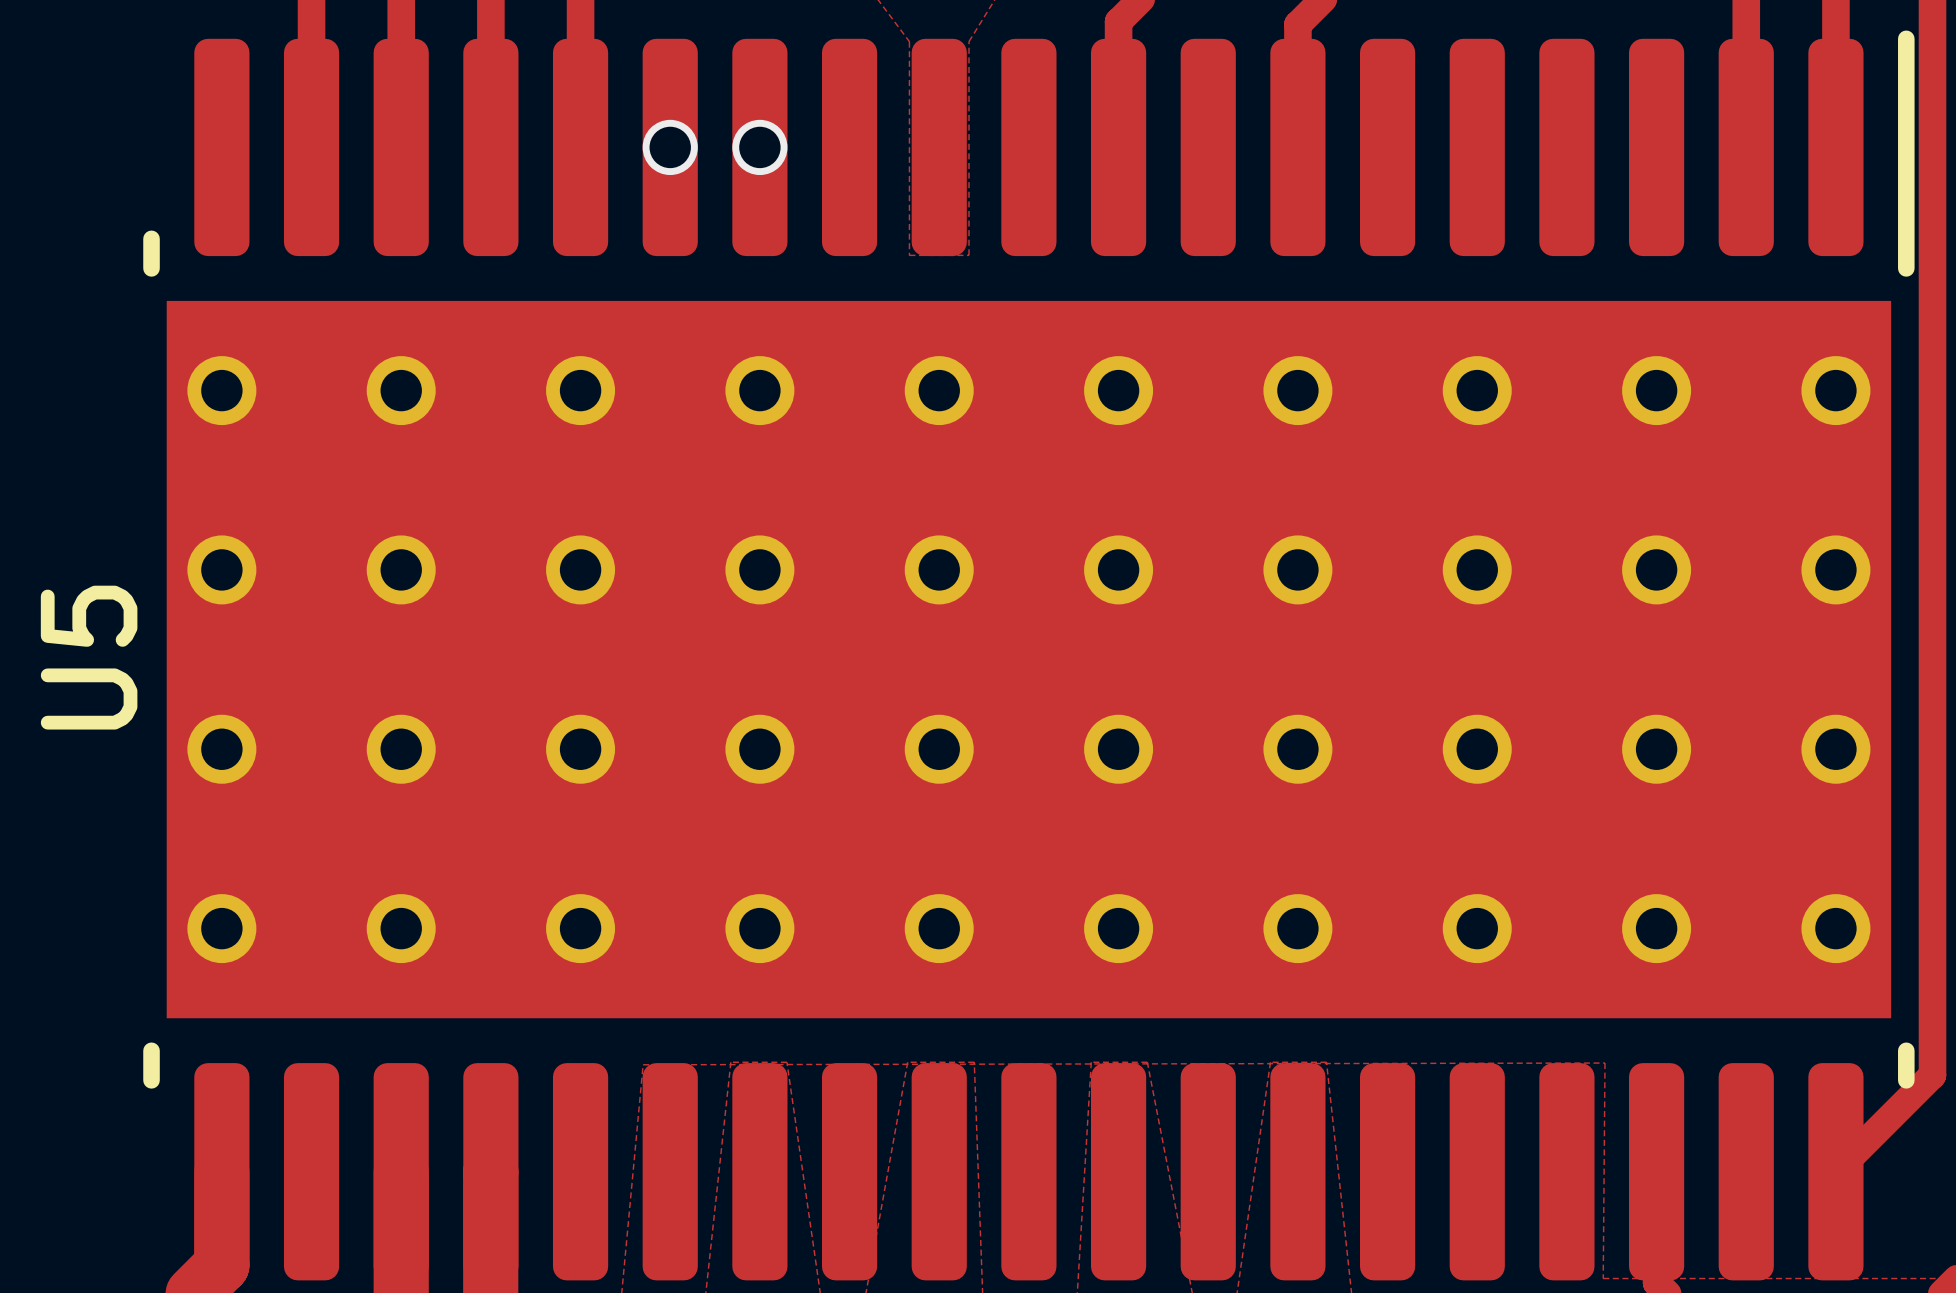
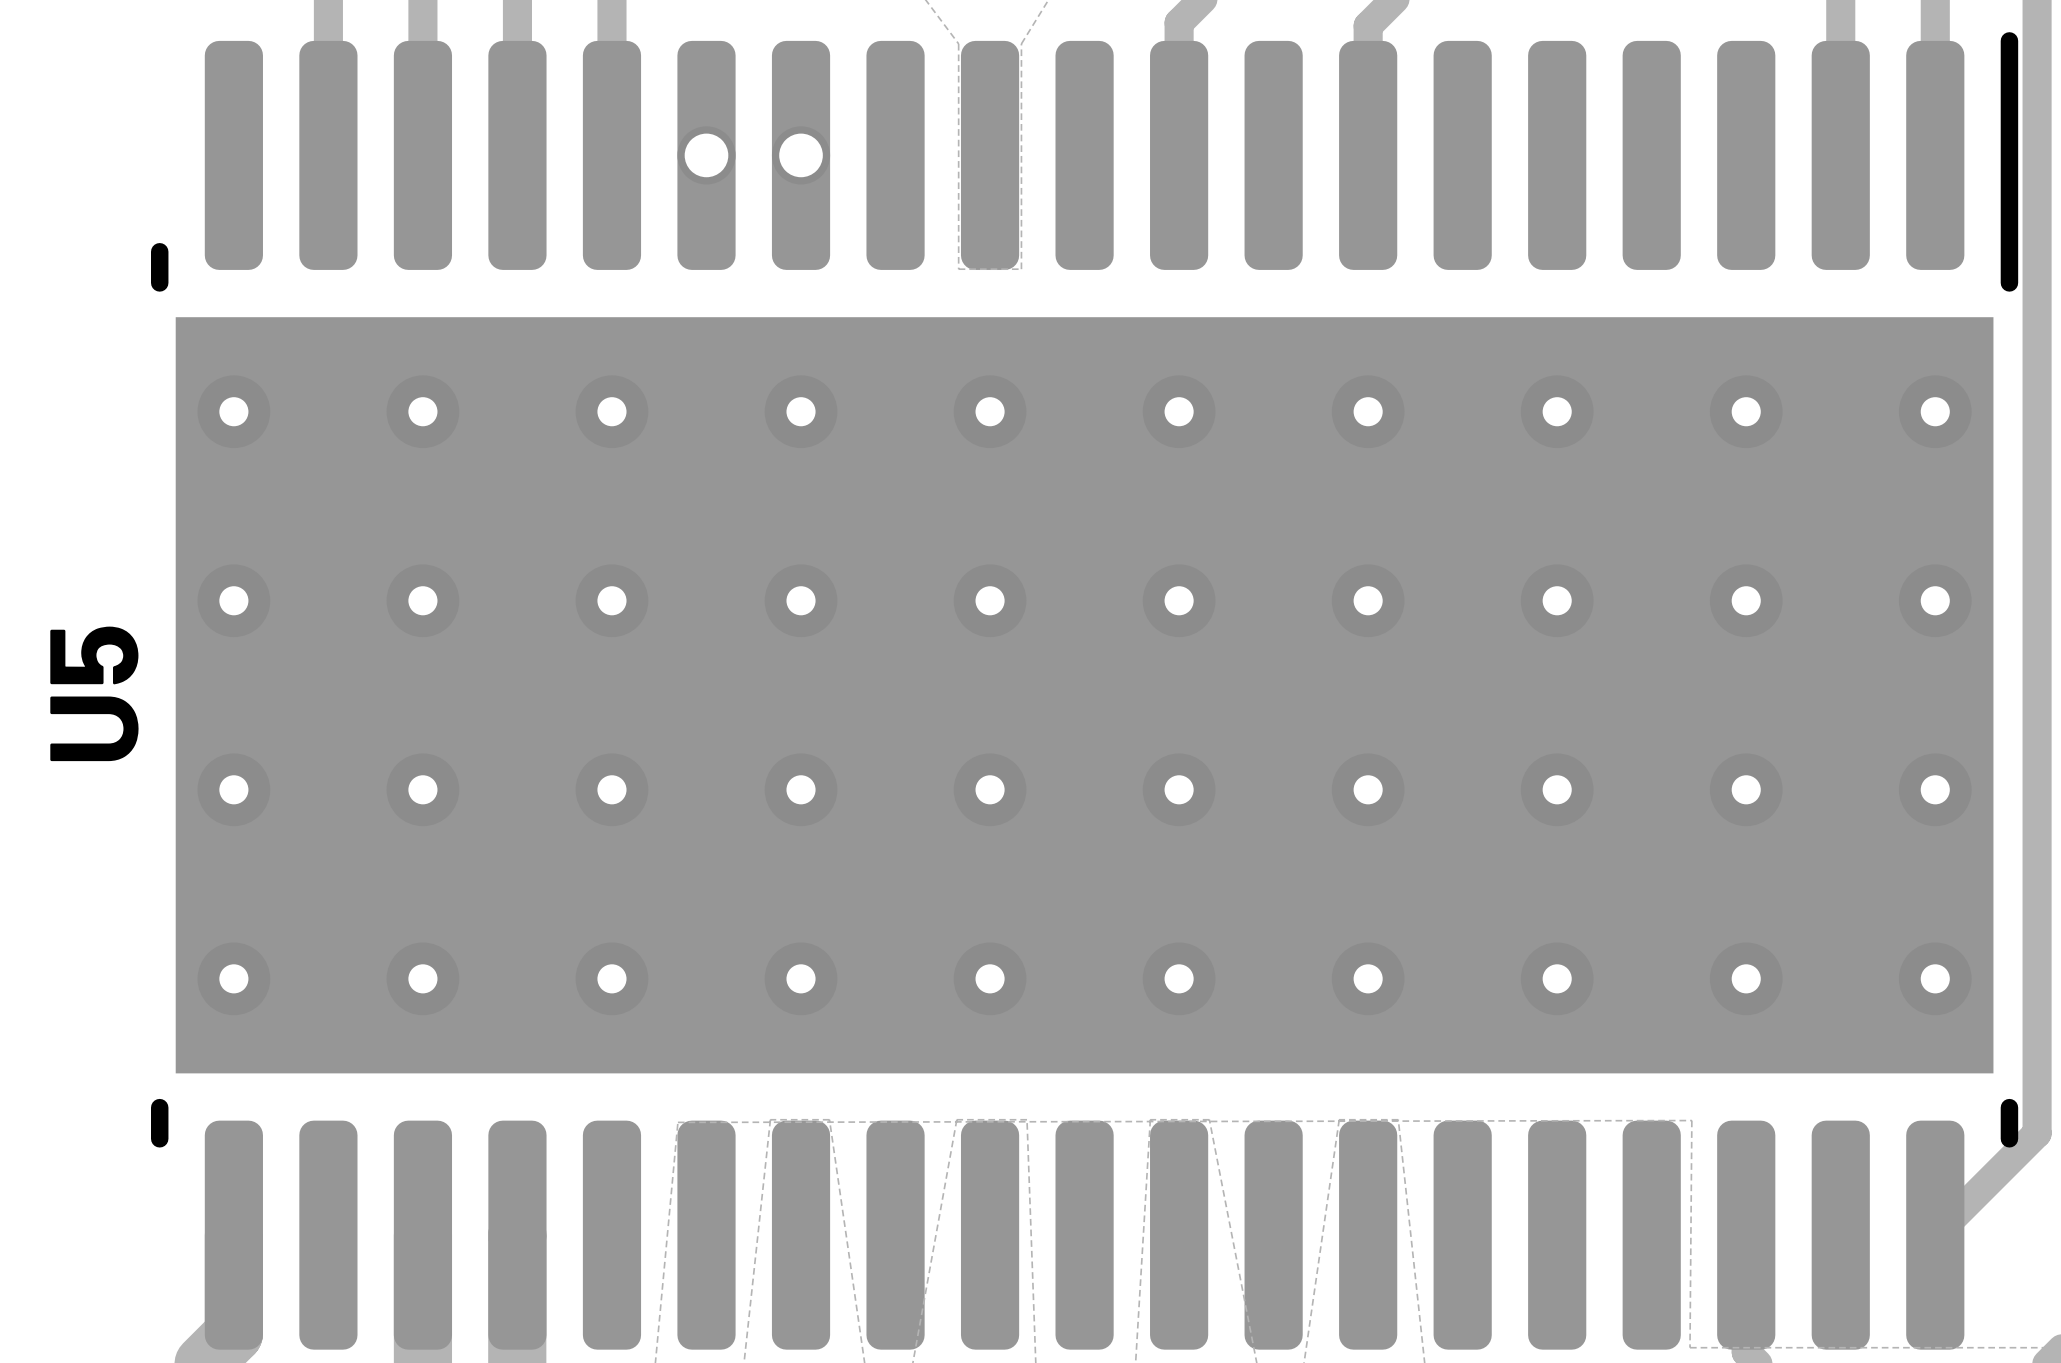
U5 footprint: [143, 30, 1915, 1281] -> [151, 32, 2019, 1350]

